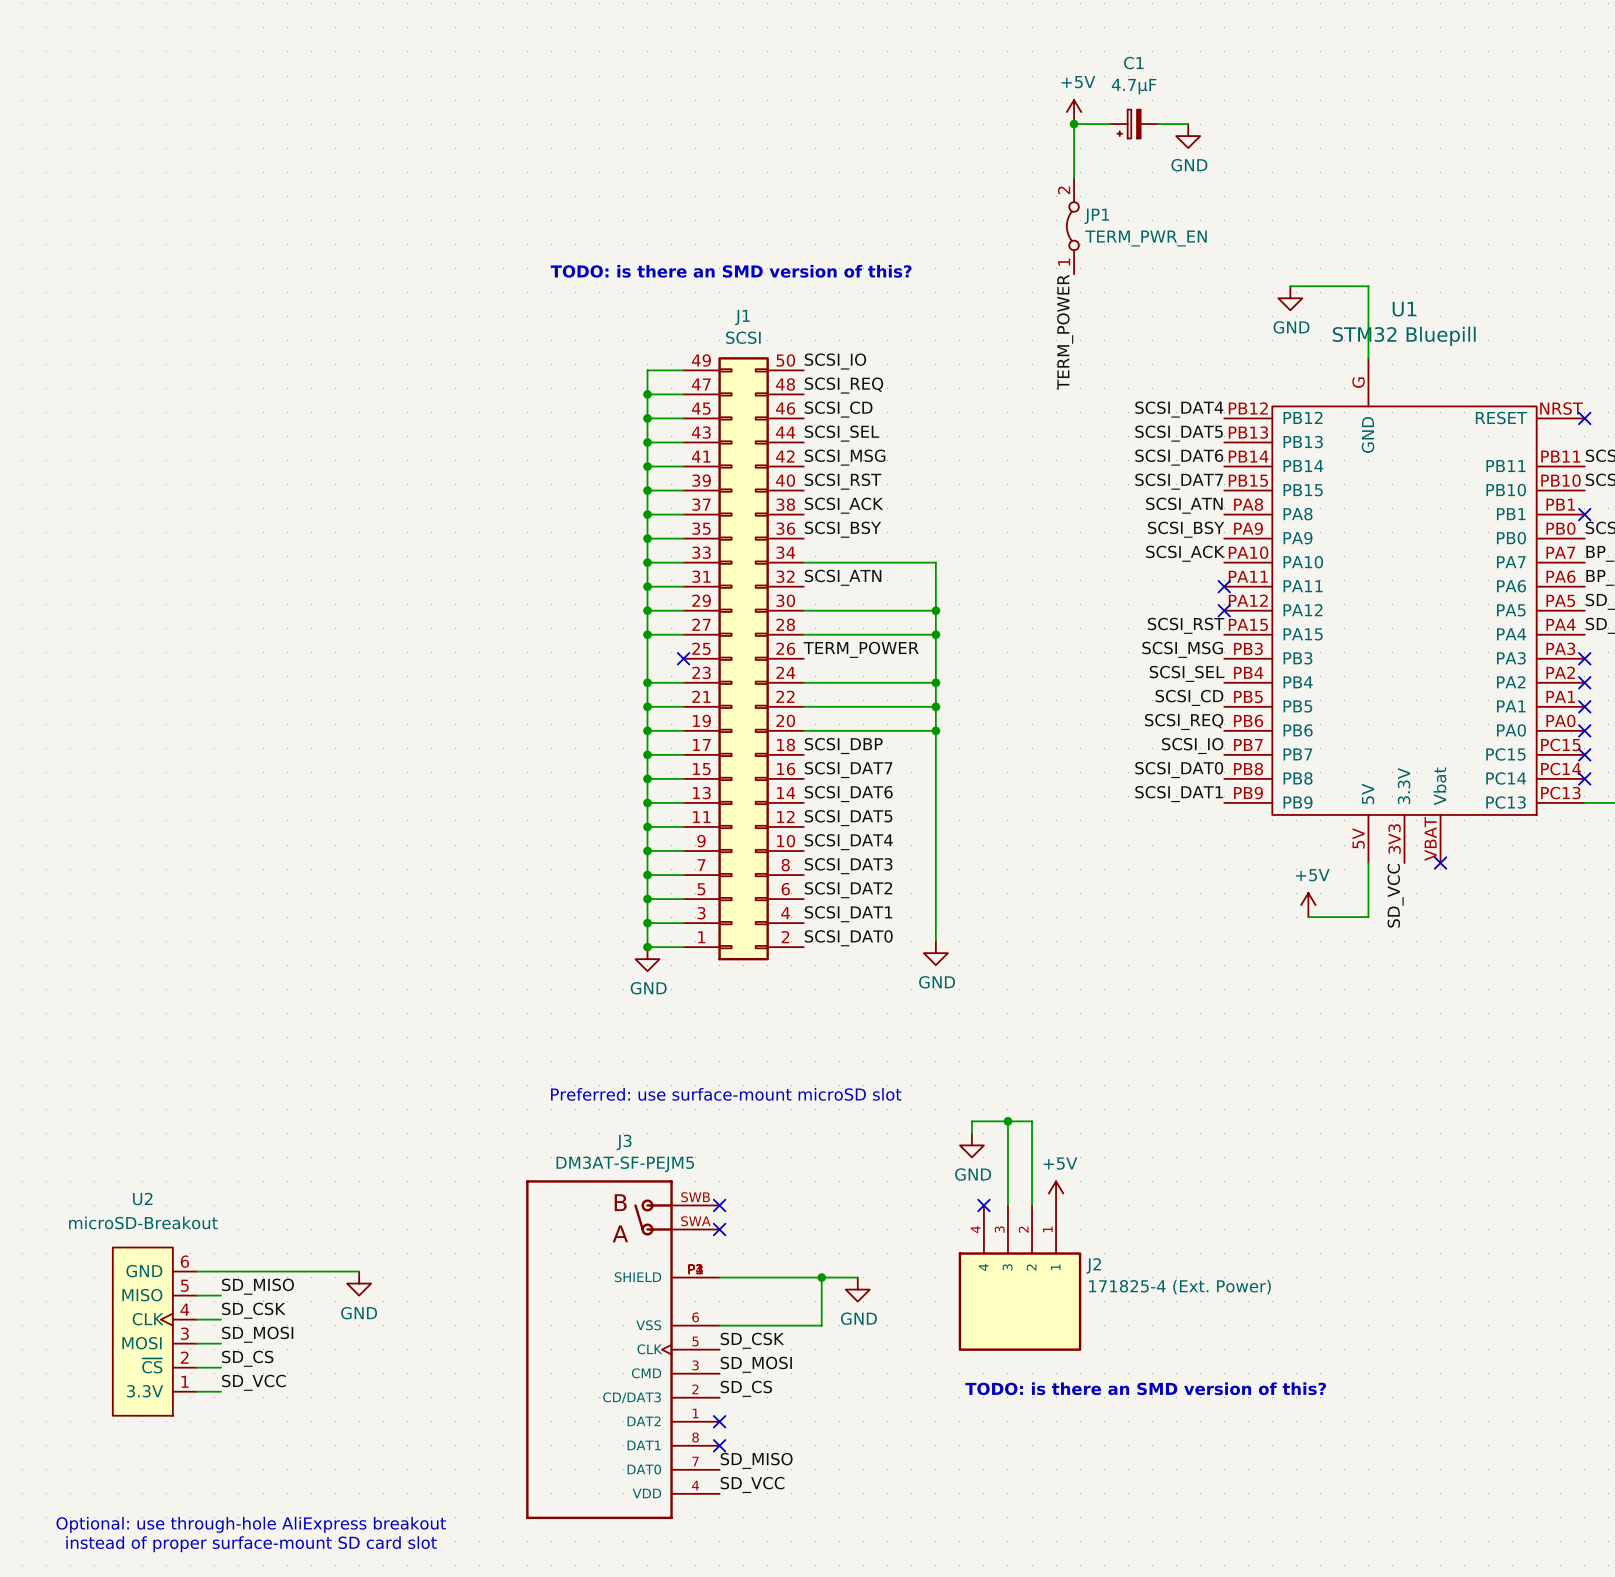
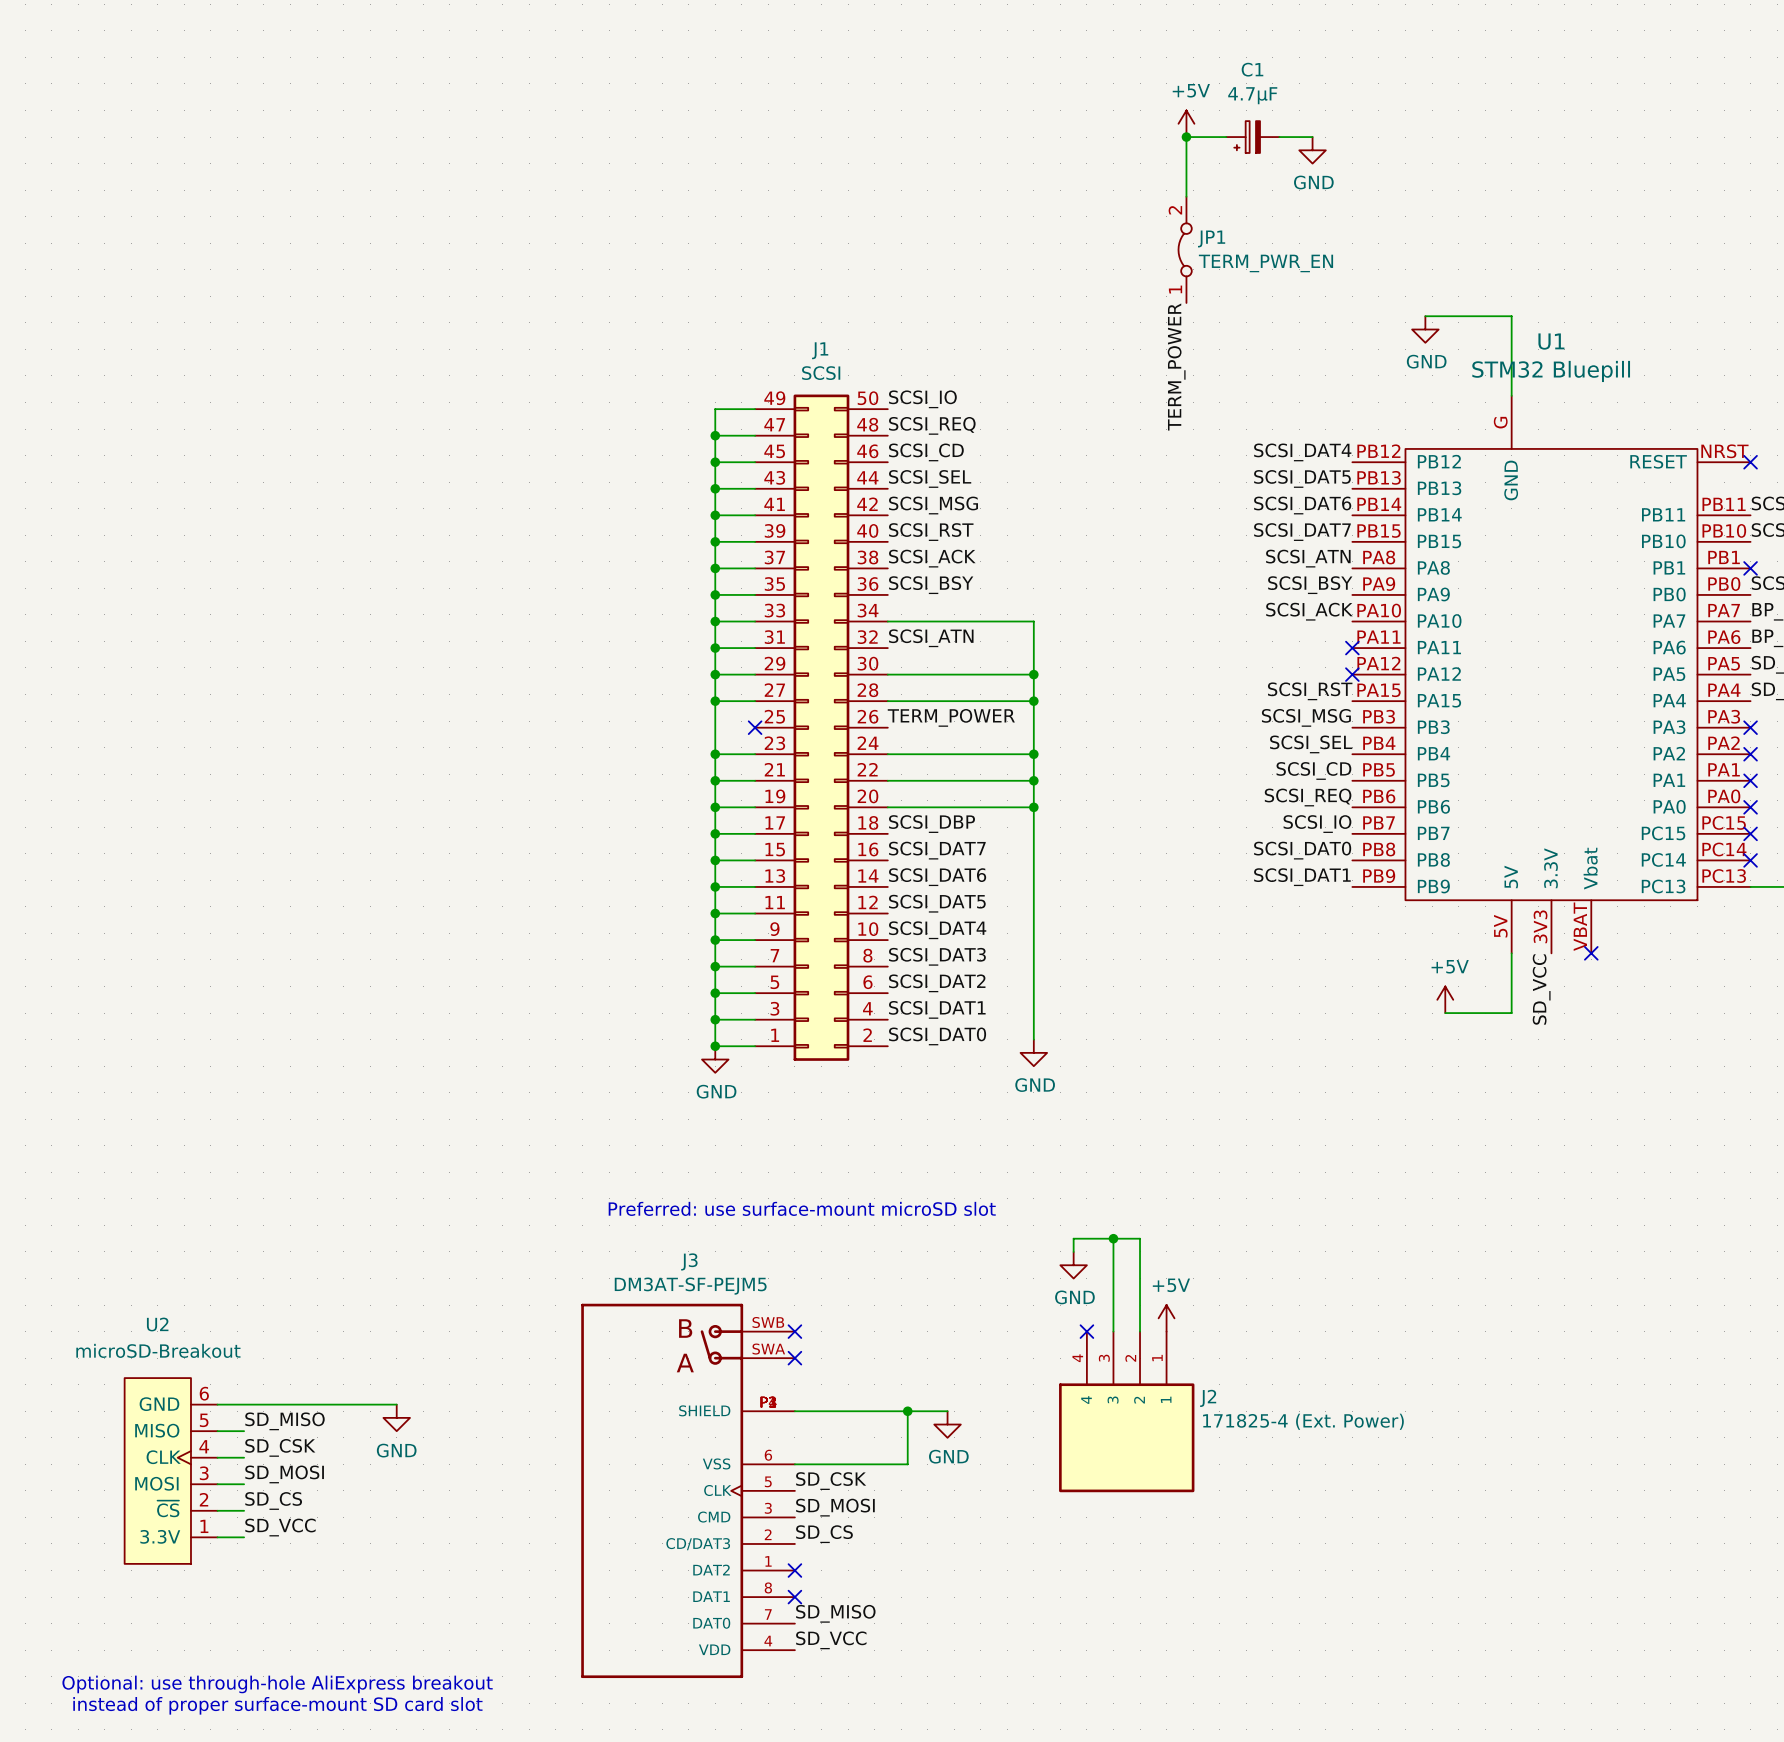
text: TODO: is there an SMD version of this? (731, 271) -> none
text: TODO: is there an SMD version of this? (1145, 1388) -> none

